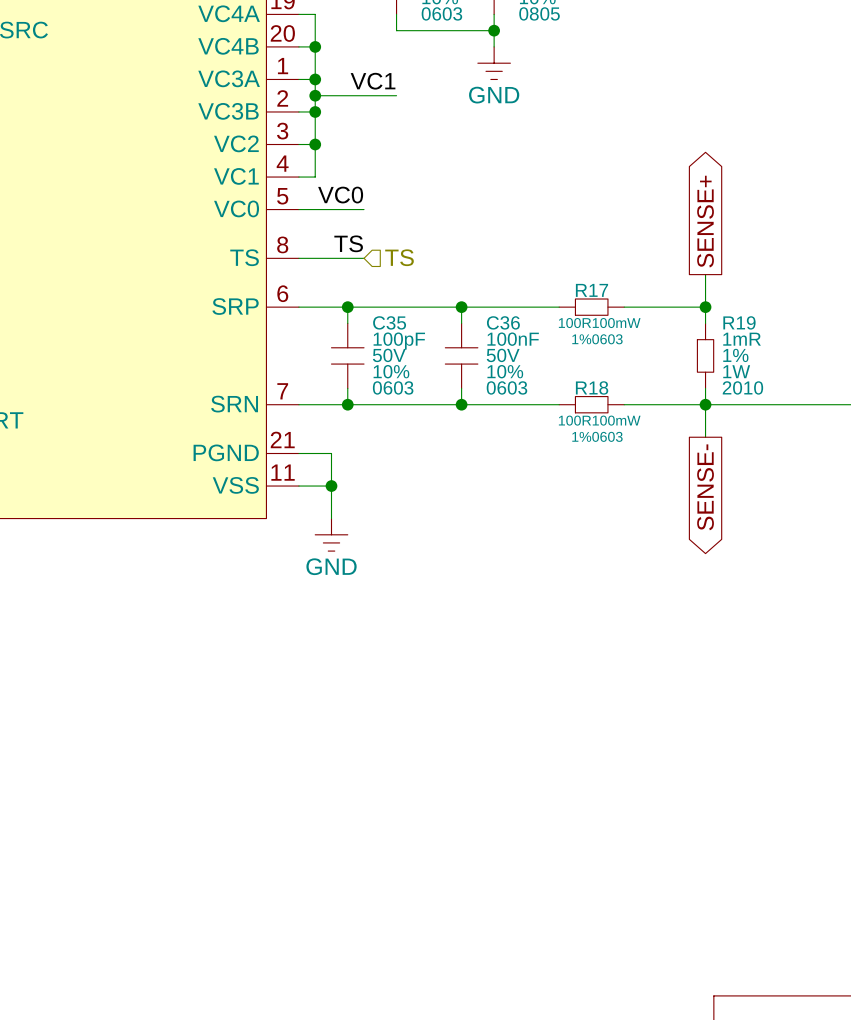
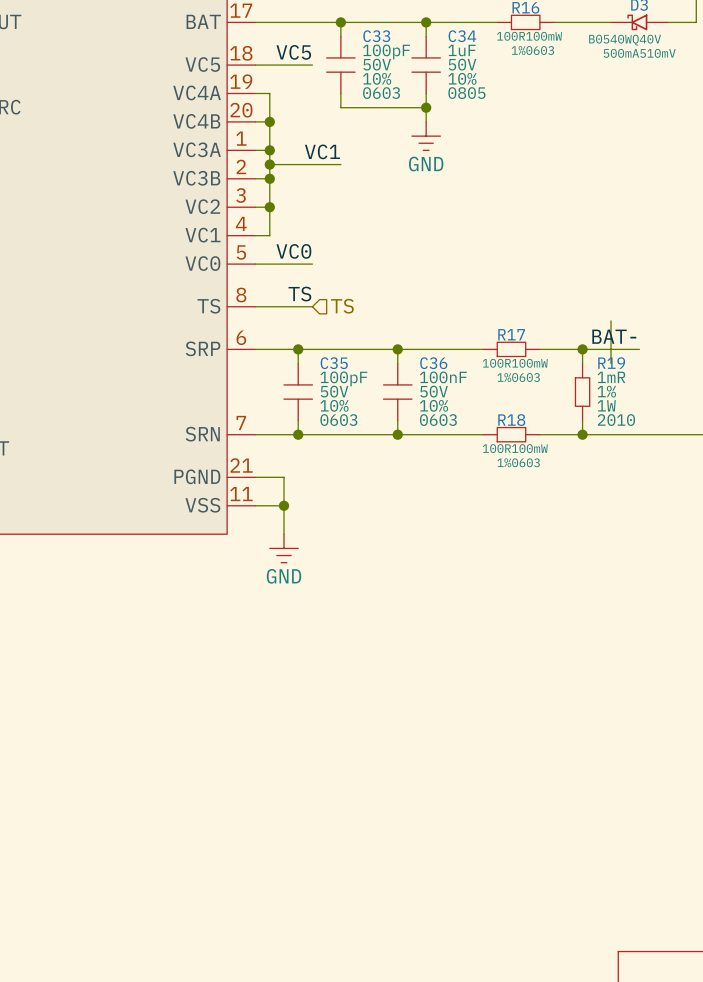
global label: SENSE+ (705, 221) -> none
label: none -> BAT- (614, 336)
wire: none -> (582, 349) (582, 363)
wire: none -> (611, 349) (639, 349)
junction position: (705, 307) -> (582, 349)
R19 position: (705, 355) -> (582, 392)
wire: none -> (582, 420) (582, 434)
wire: (705, 388) (705, 437) -> none
junction position: (705, 404) -> (582, 434)
global label: SENSE- (705, 487) -> none

